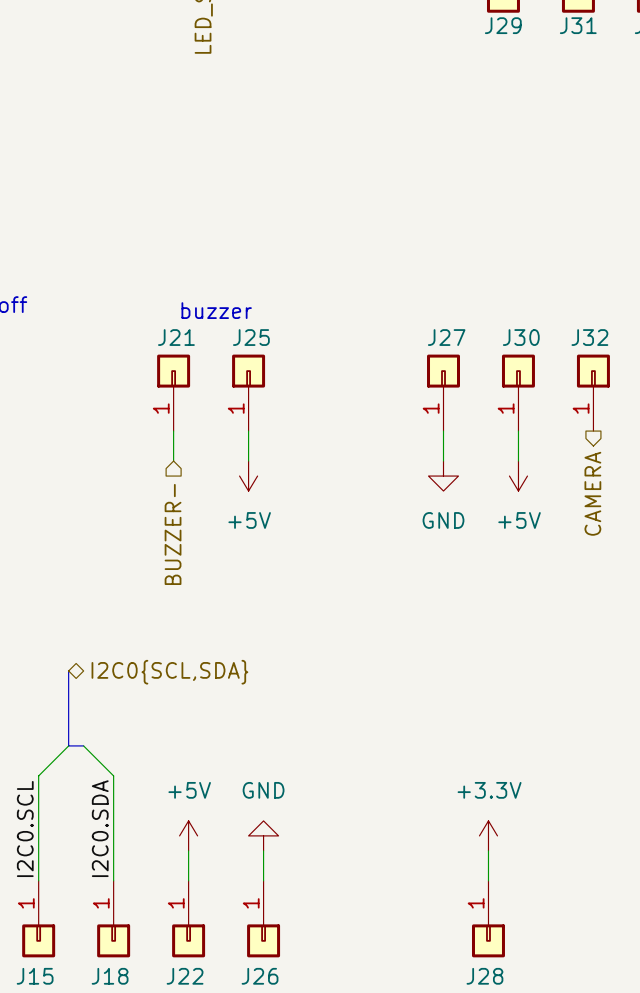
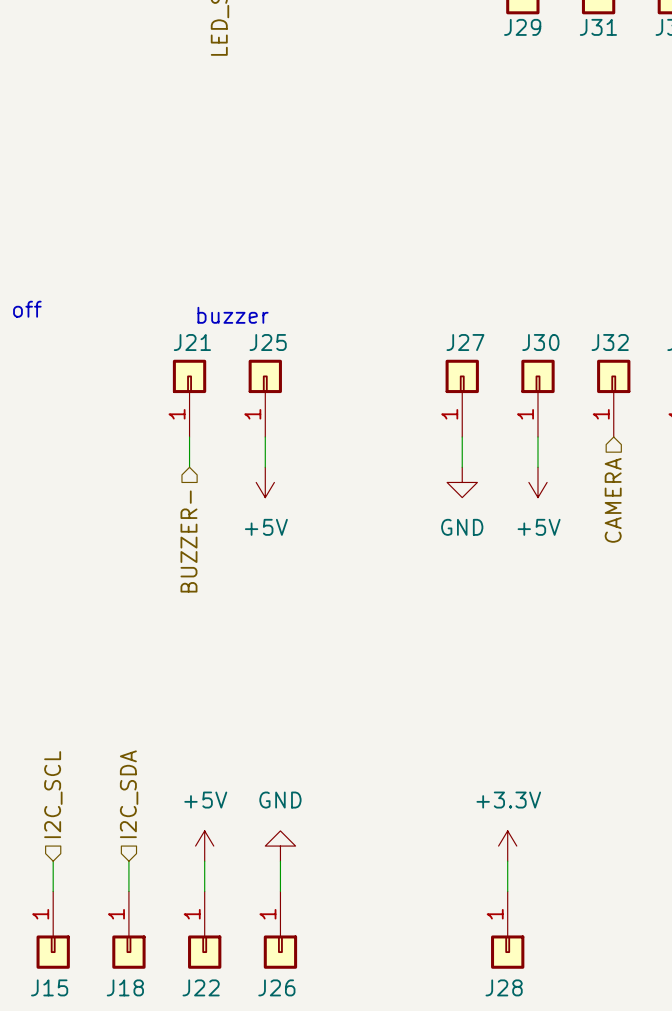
hierarchical label shape: output (592, 493) -> input (613, 500)
bus: (68, 670) (68, 745) (83, 745) -> none
hierarchical label: I2C0{SCL,SDA} (169, 672) -> none
wire: (68, 745) (38, 775) (38, 850) -> none
wire: (83, 745) (113, 775) (113, 850) -> none
hierarchical label: none -> I2C_SCL (53, 794)
hierarchical label: none -> I2C_SDA (129, 794)
label: I2C0.SDA (100, 828) -> none
label: I2C0.SCL (25, 829) -> none

